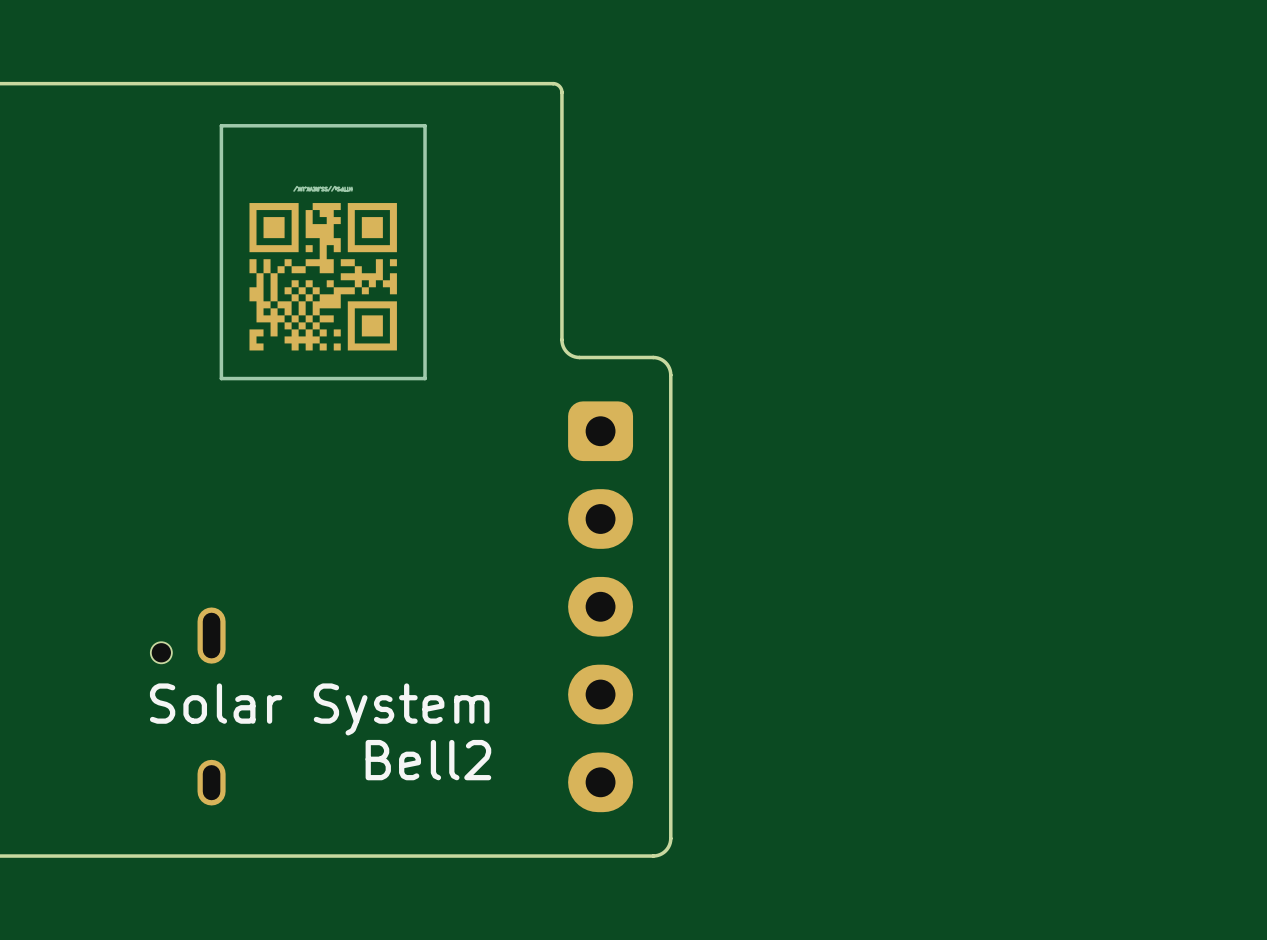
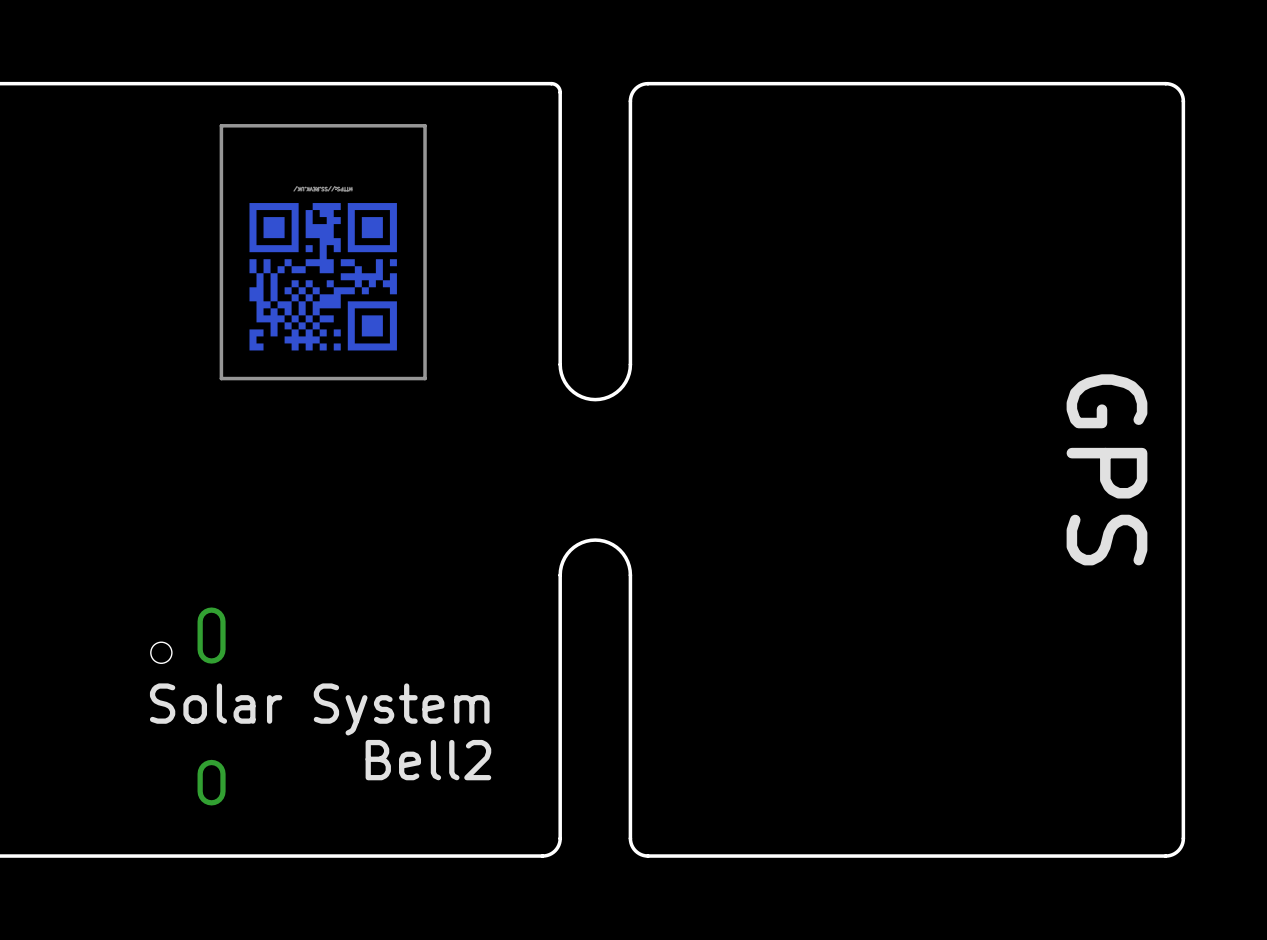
board edge: (551, 83) (558, 85) (561, 92) (563, 346) (568, 353) (577, 357) (657, 358) (667, 364) (670, 372) (670, 838) (665, 850) (653, 856) -> (551, 83) (557, 86) (560, 92) (560, 369) (562, 377) (570, 389) (581, 396) (595, 399) (608, 396) (620, 389) (627, 377) (630, 369) (630, 101) (632, 92) (639, 86) (647, 83) (1165, 83) (1176, 87) (1183, 98) (1183, 838) (1179, 849) (1174, 853) (1165, 856) (653, 856)
text: none -> GPS (1106, 469)
part: (600, 606) -> none
board edge: (647, 856) (542, 856) -> (647, 856) (635, 850) (630, 838) (630, 570) (627, 561) (620, 550) (608, 542) (595, 540) (581, 542) (570, 550) (562, 561) (560, 570) (560, 838) (555, 850) (542, 856)

